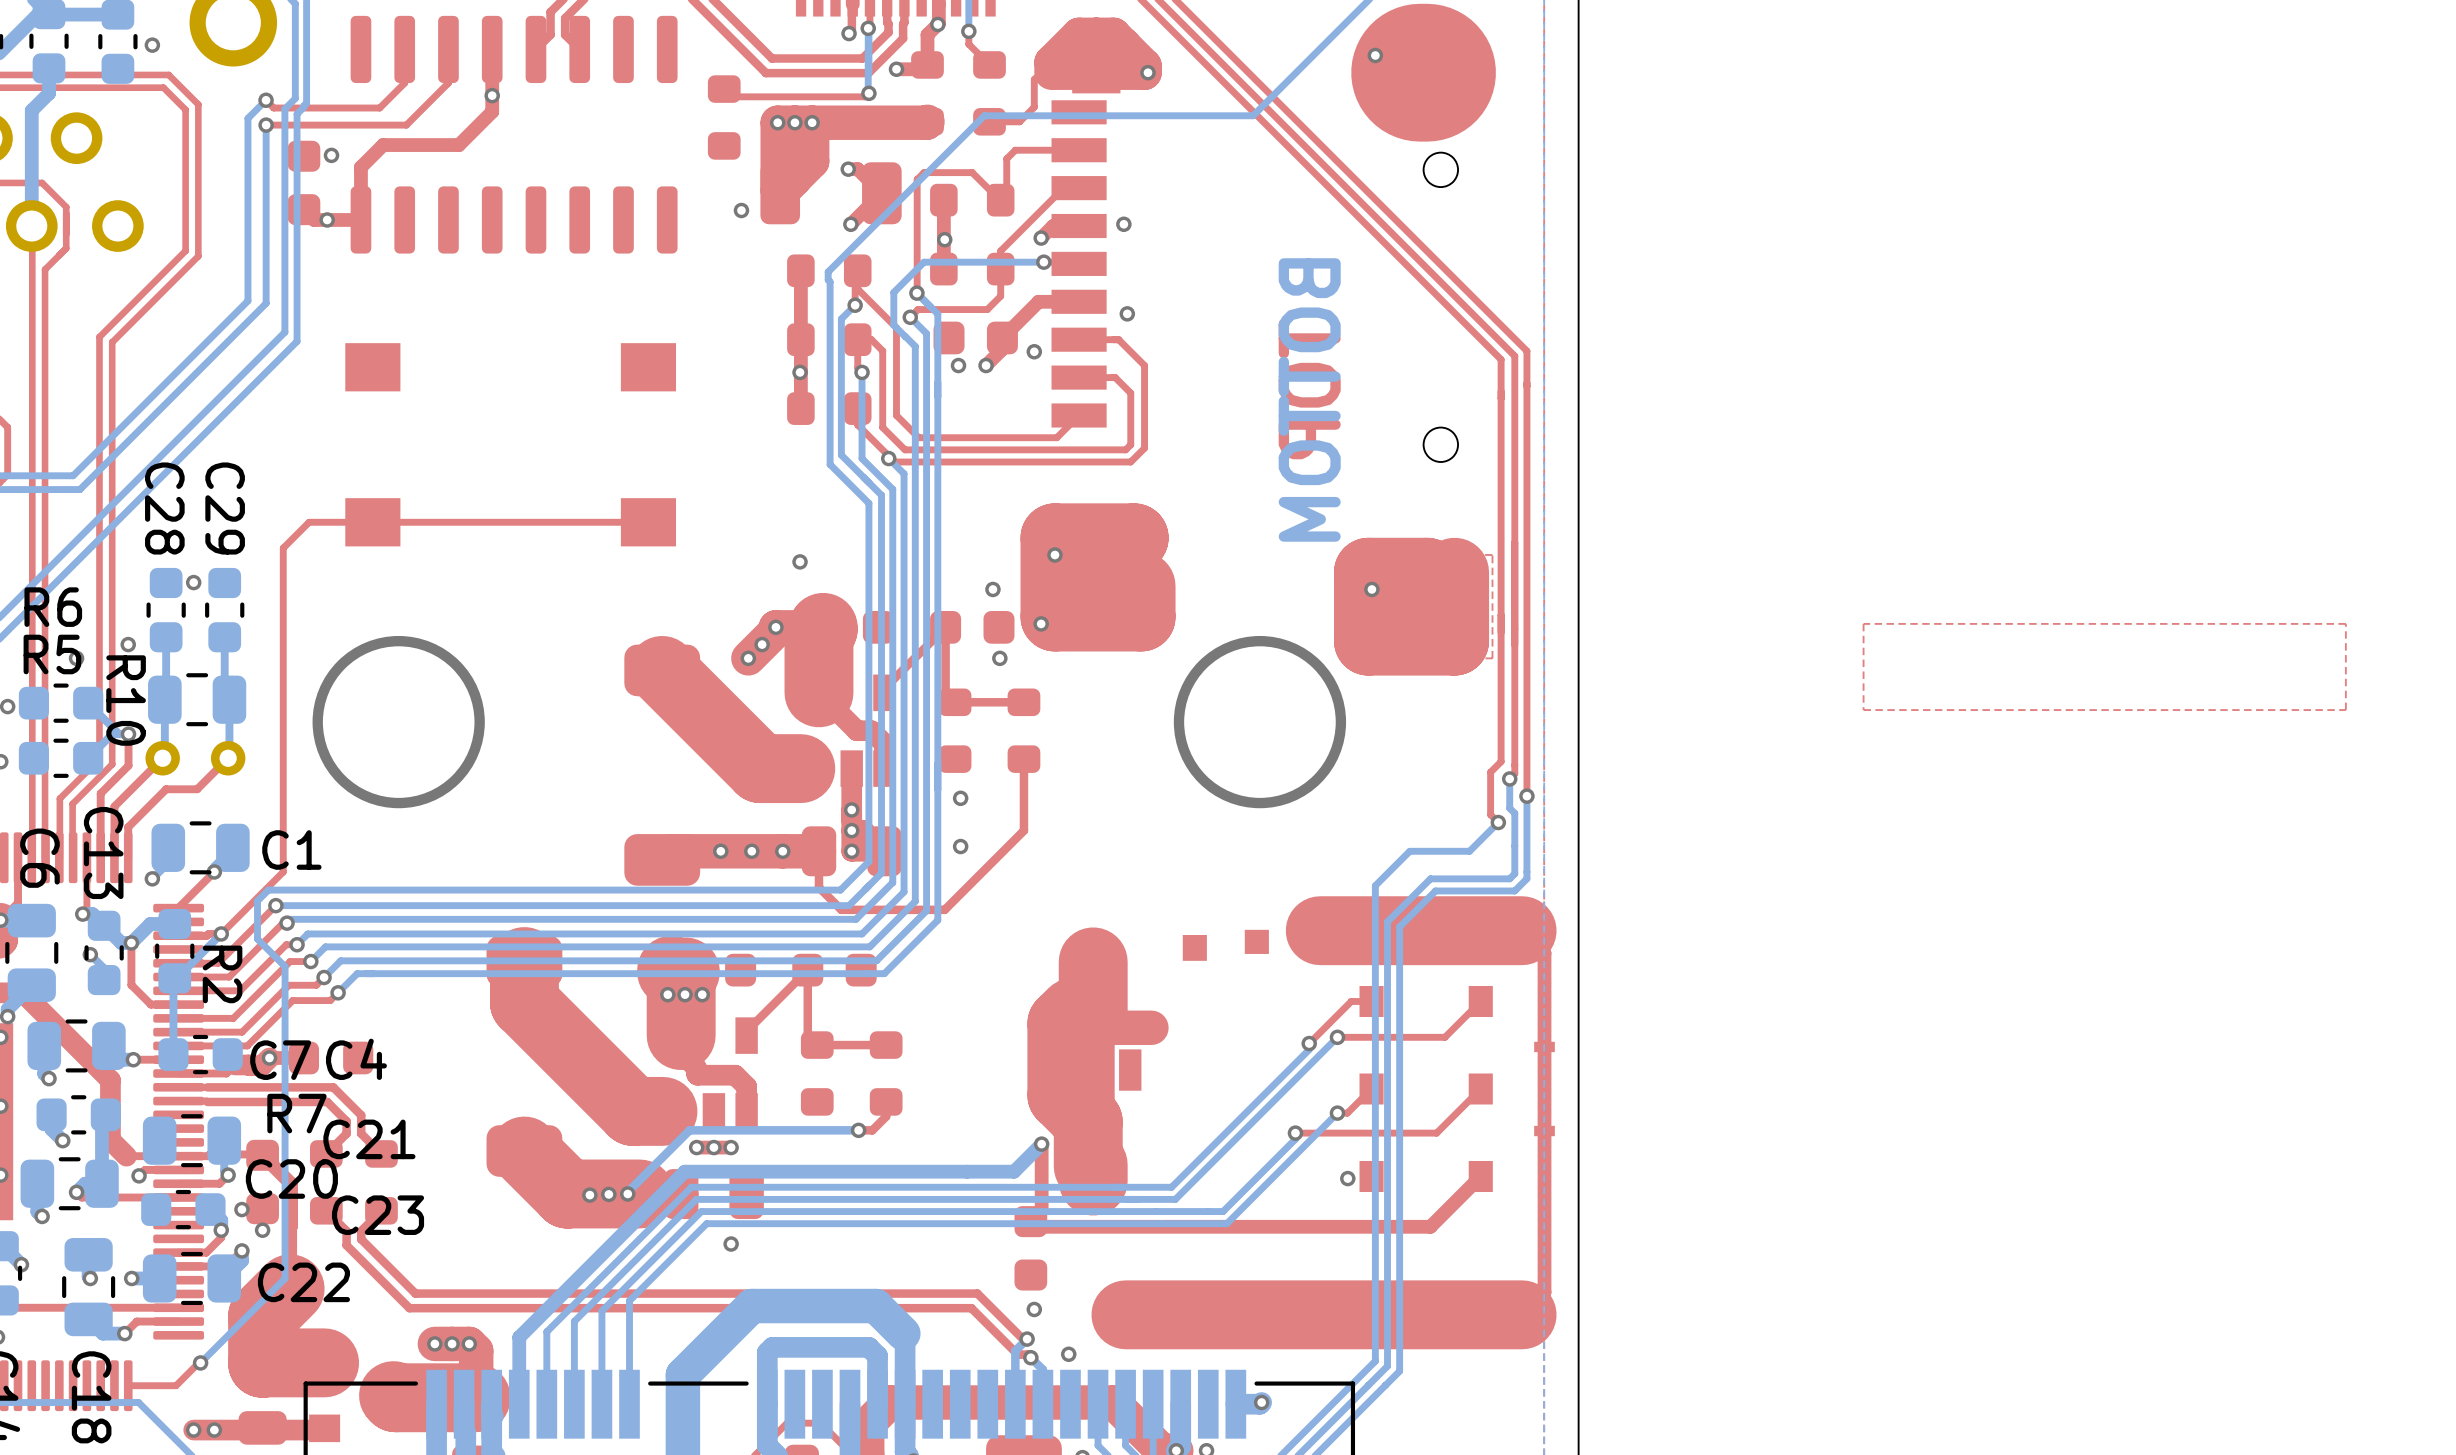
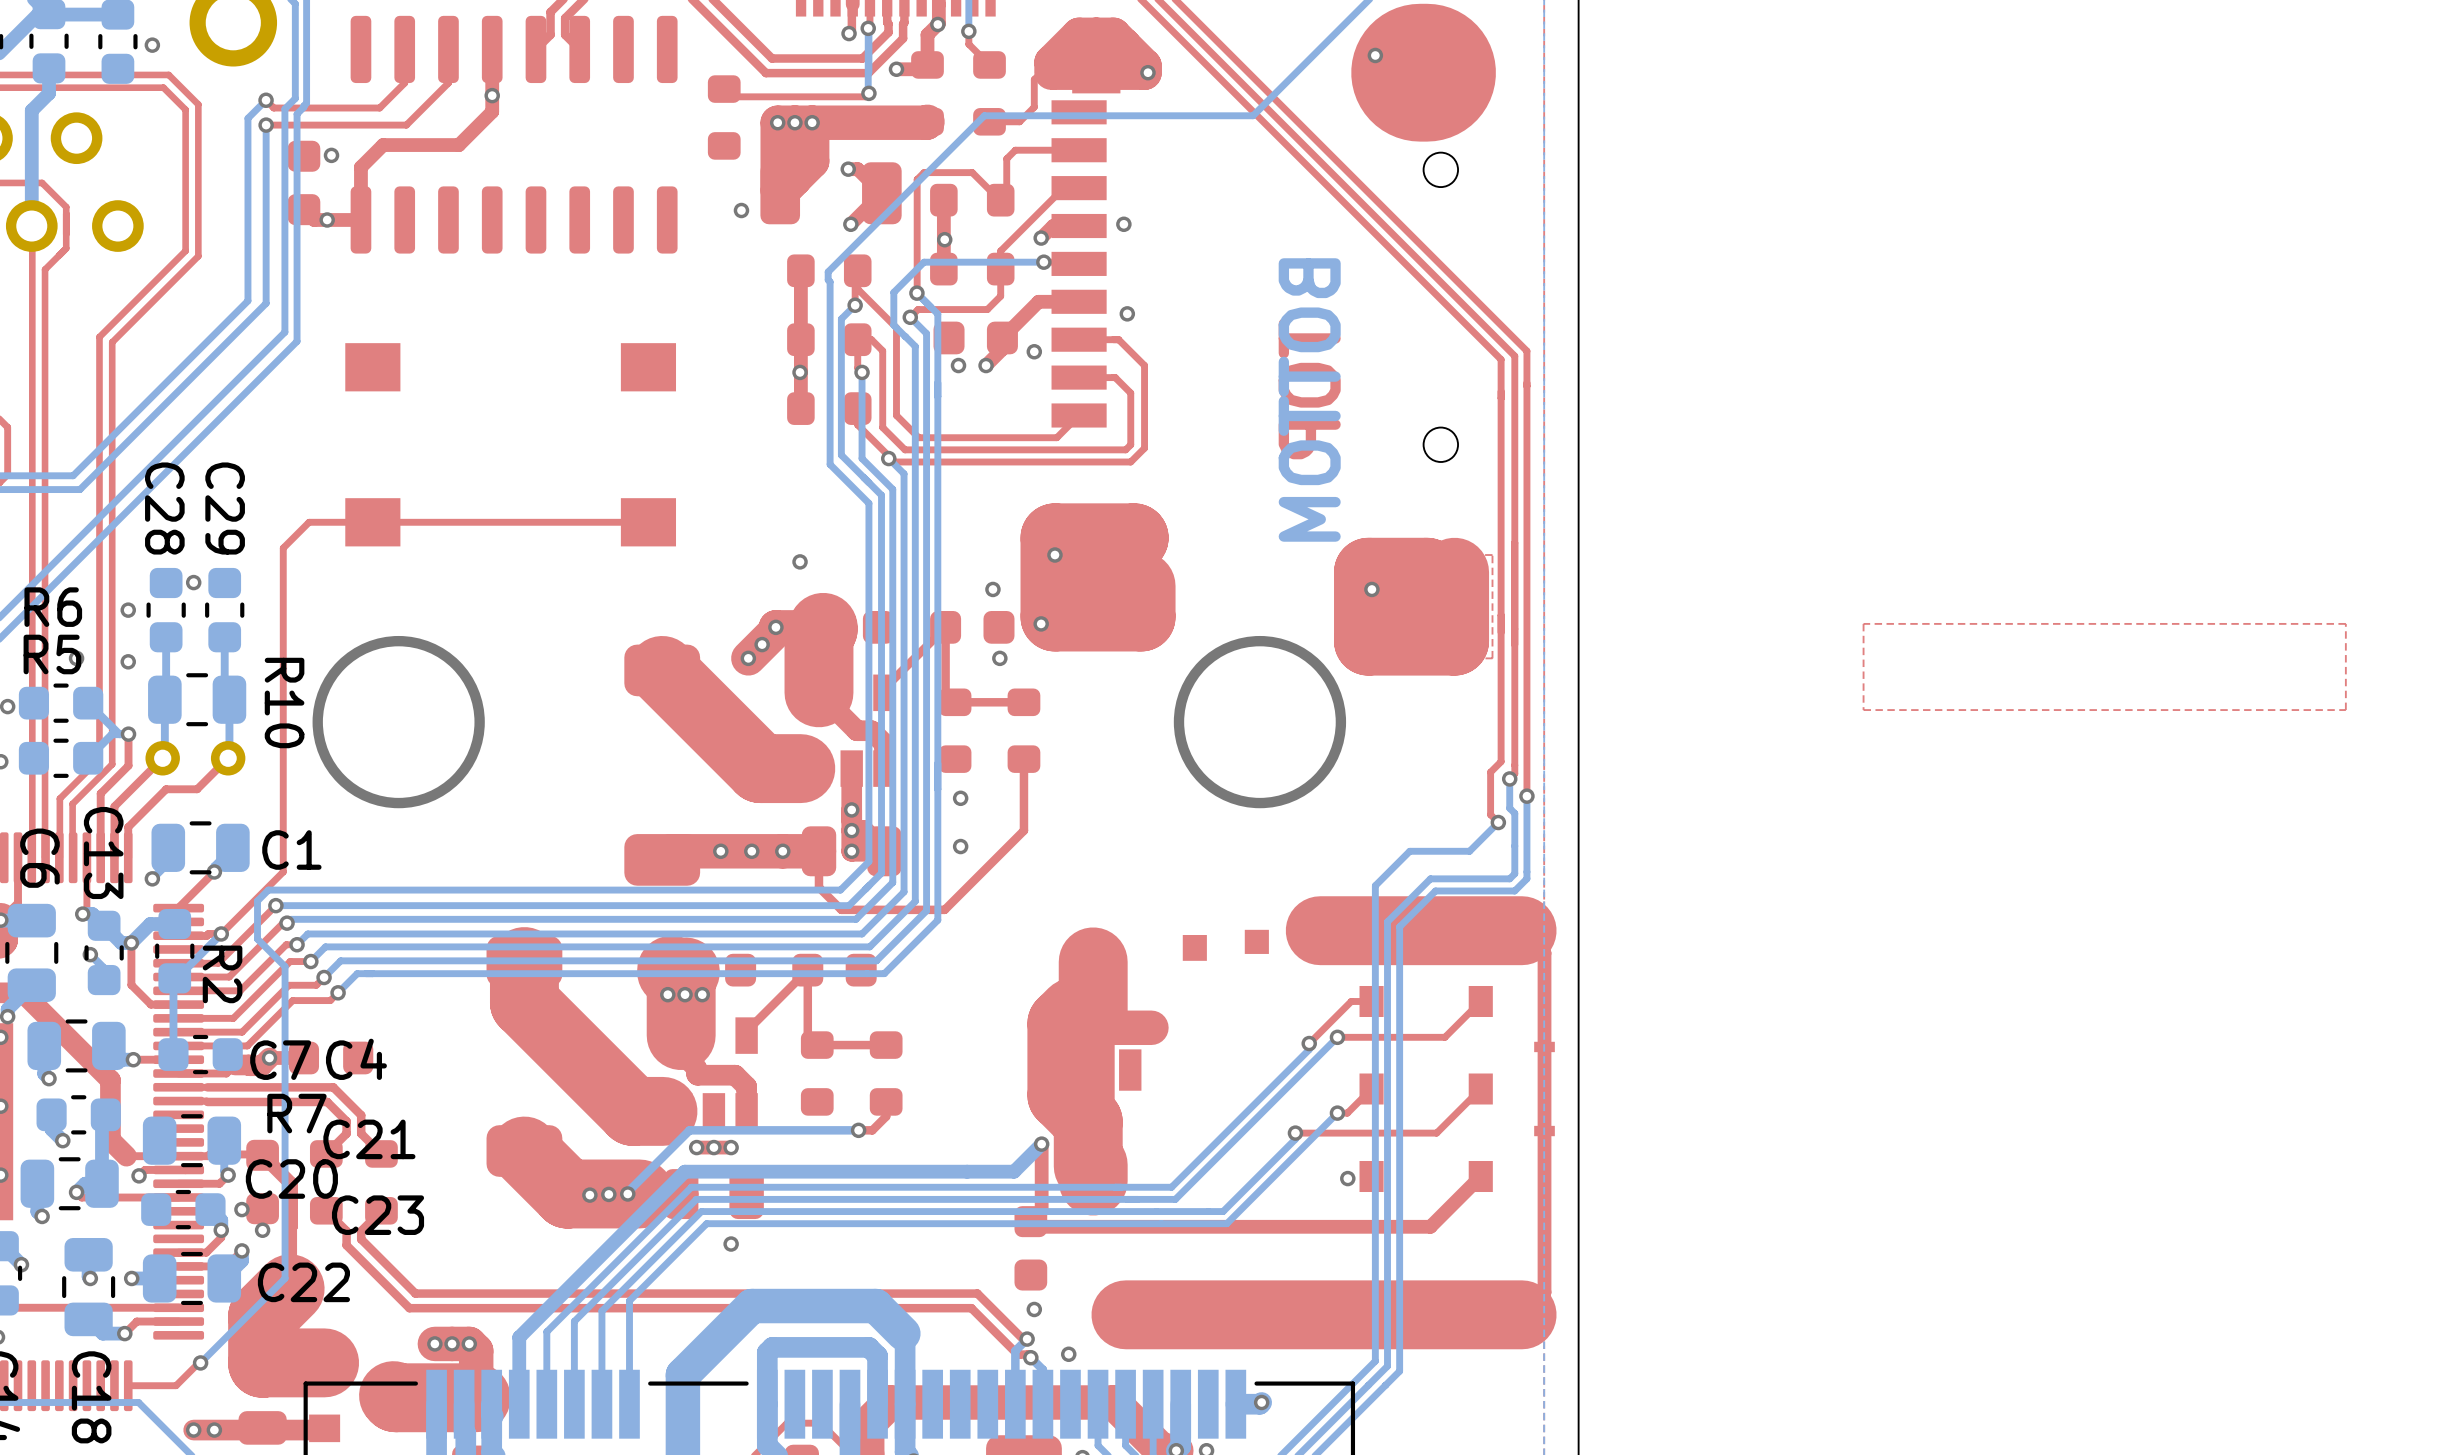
via: none -> (128, 610)
via: (128, 644) -> none
via: none -> (128, 661)
R10 name position: R10 (126, 700) -> R10 (284, 703)

